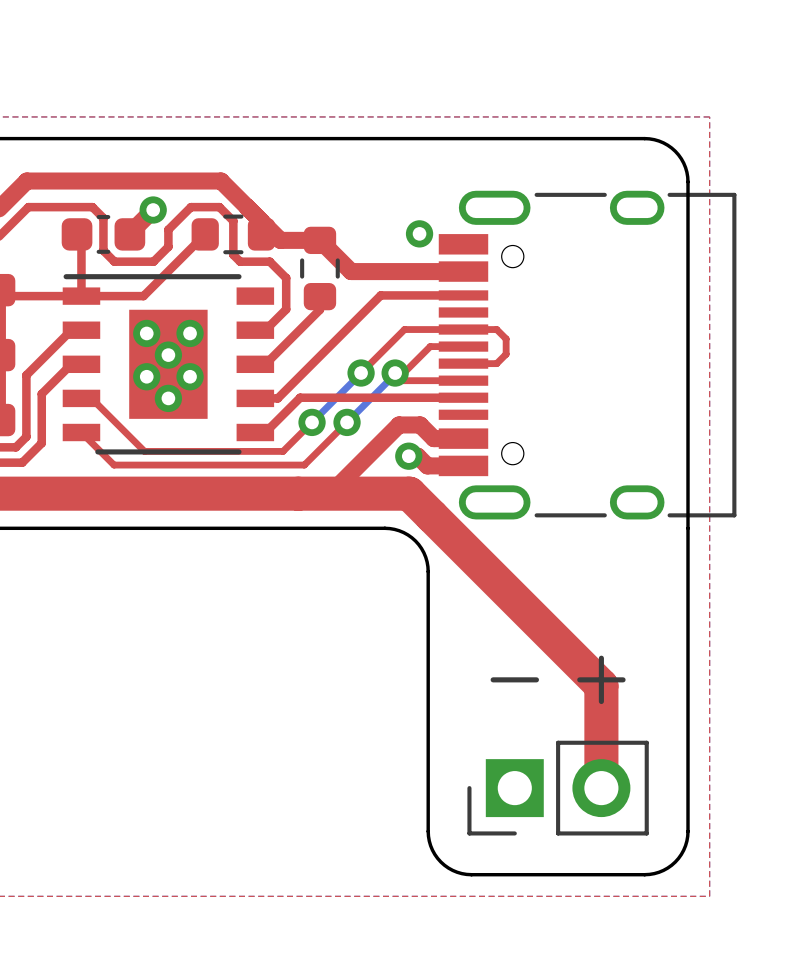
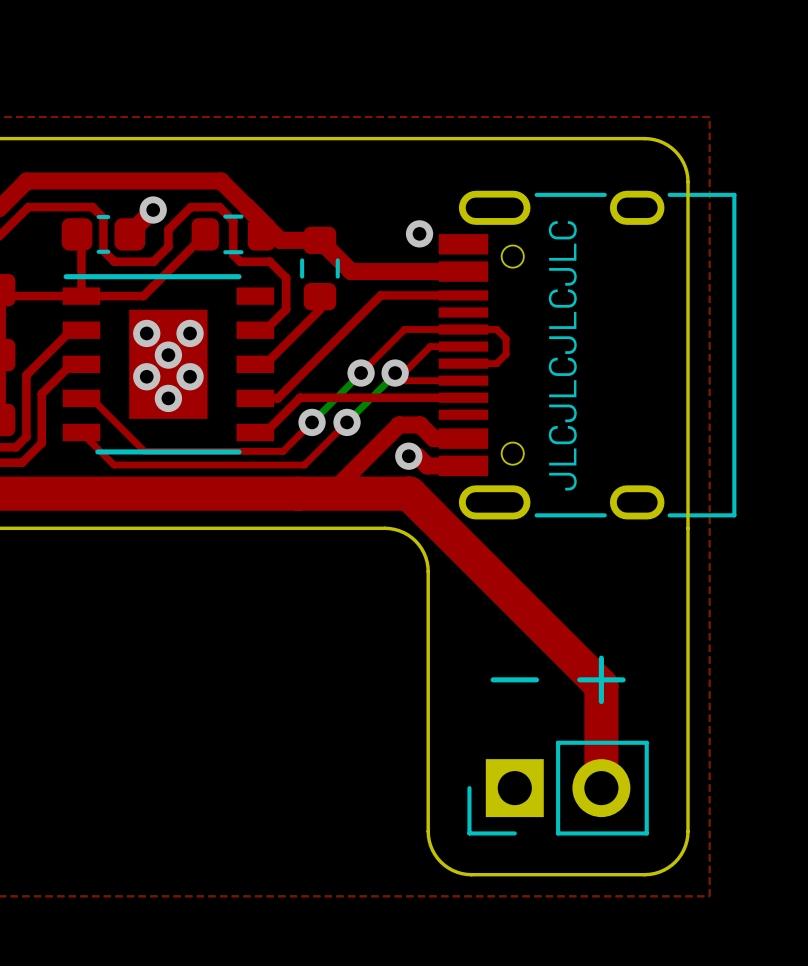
text: none -> JLCJLCJLCJLC (562, 355)

